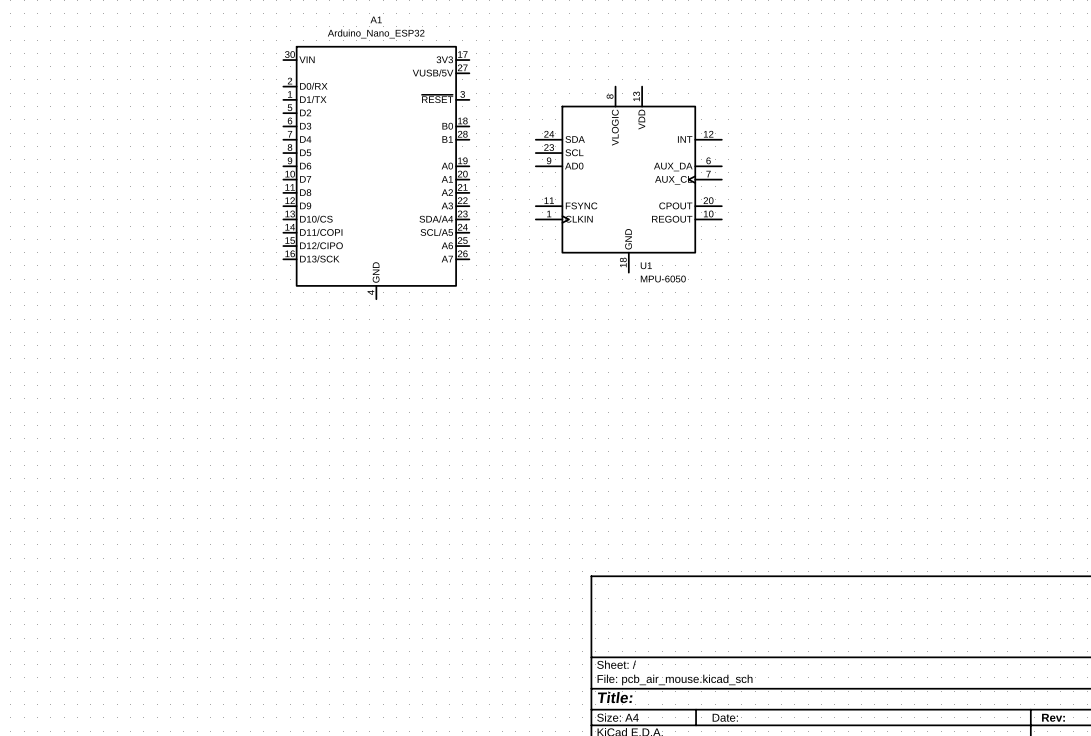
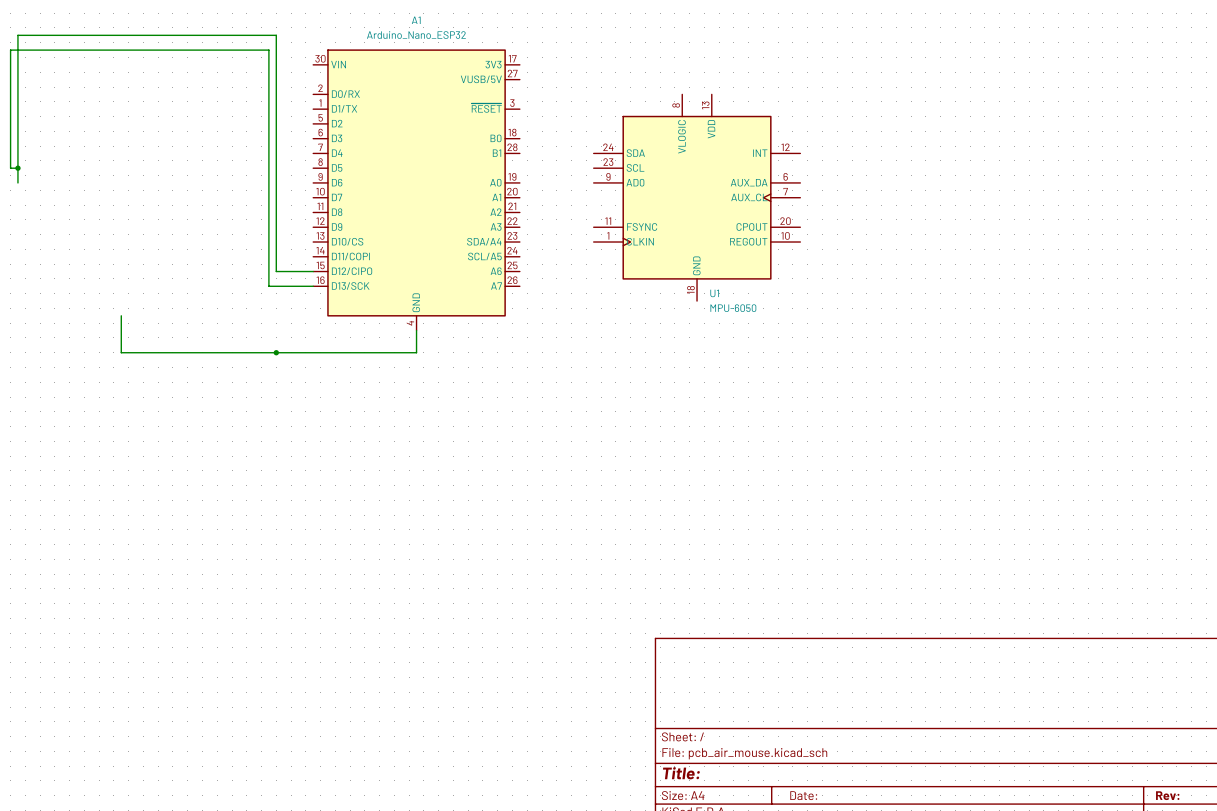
wire: none -> (17, 168) (10, 168) (10, 50) (268, 50) (268, 286) (313, 286)
junction: none -> (17, 168)
wire: none -> (17, 182) (17, 35) (276, 35) (276, 271) (313, 271)
wire: none -> (121, 315) (121, 352) (416, 352) (416, 330)
junction: none -> (276, 352)

